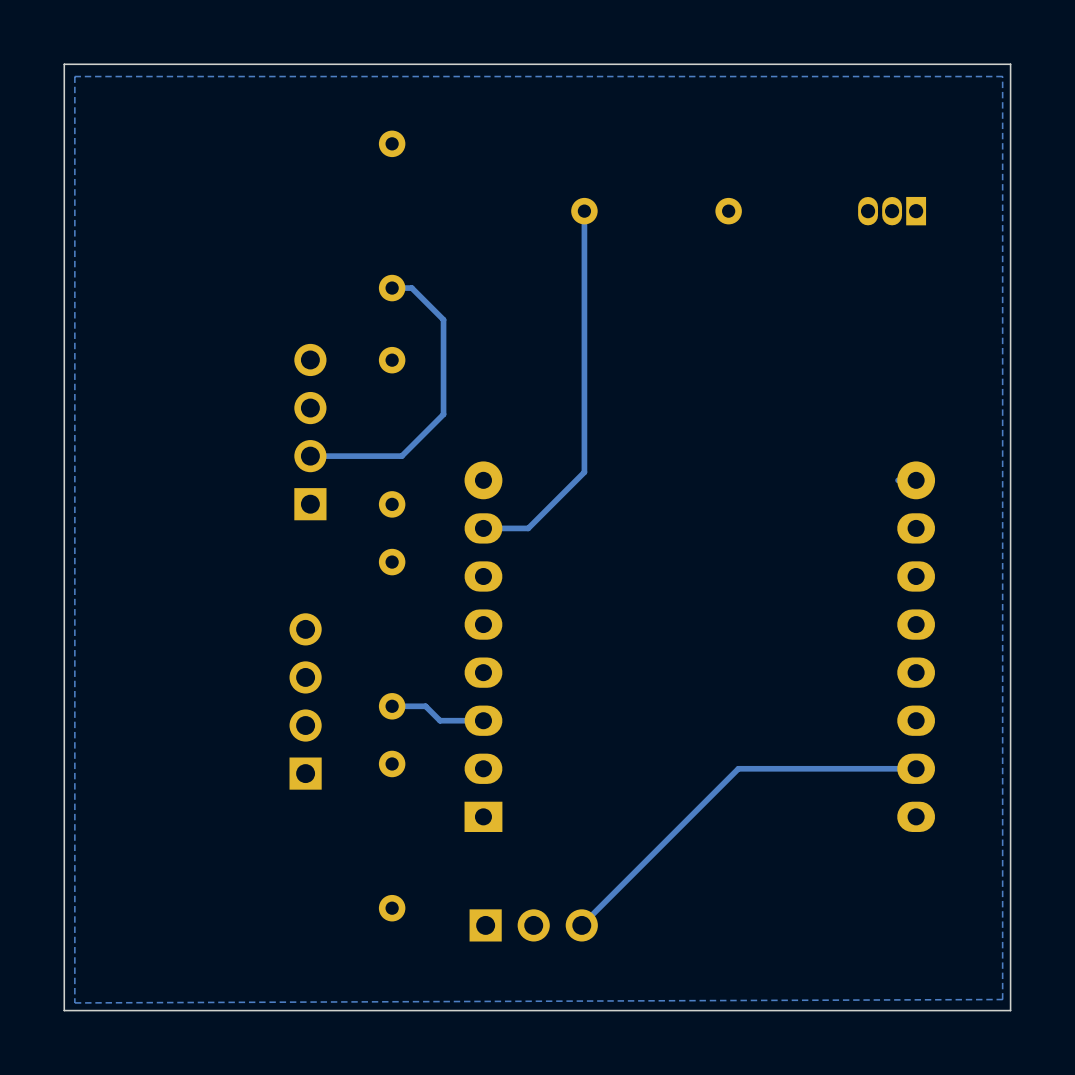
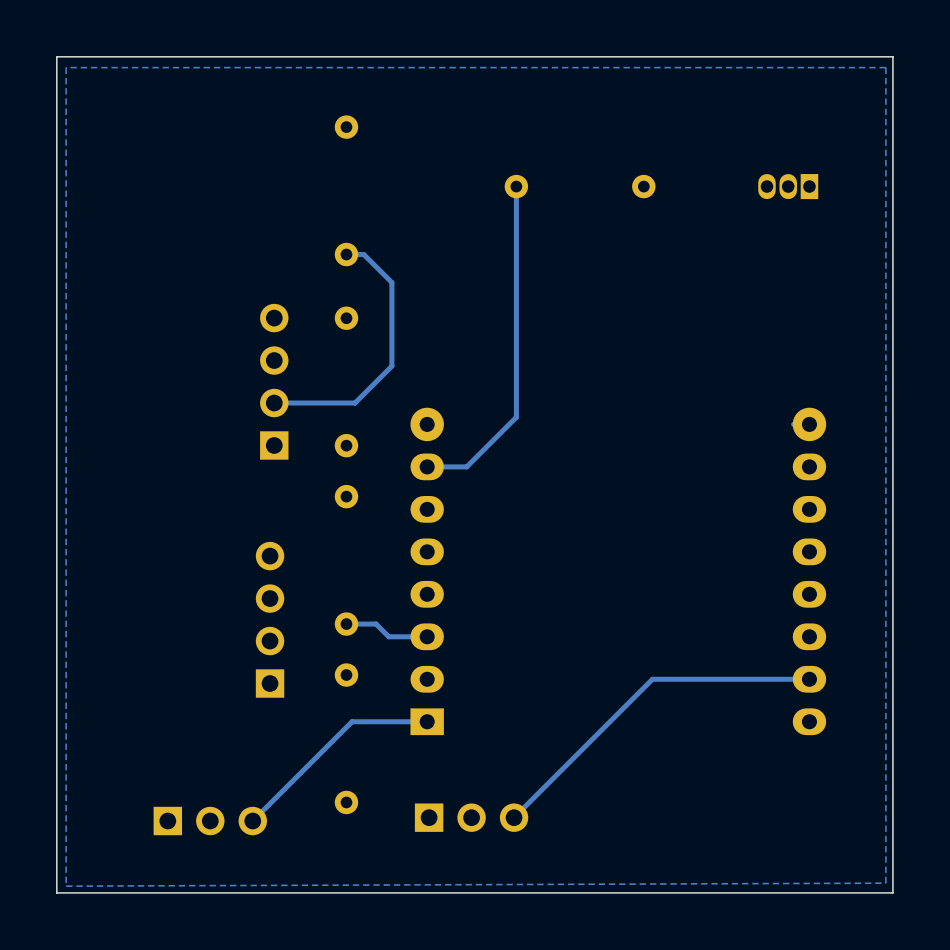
track: none -> (427, 721) (352, 721) (252, 821)
part: none -> (210, 821)

